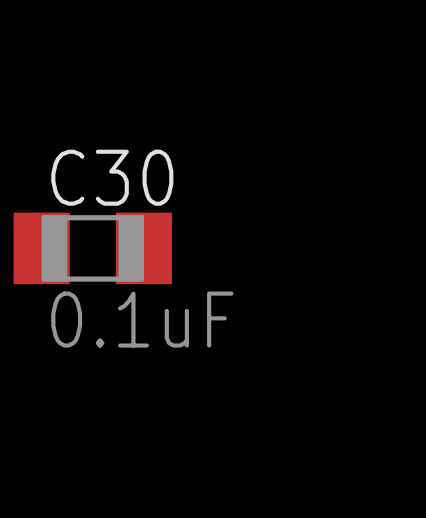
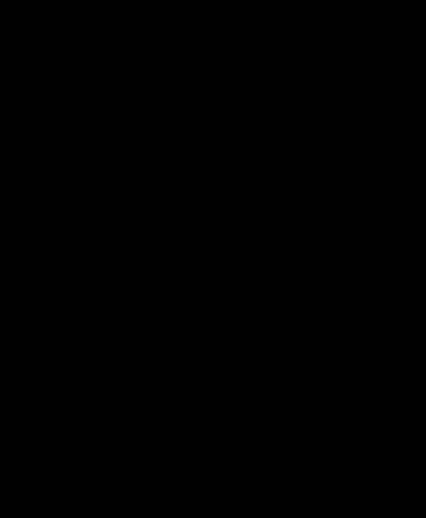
C30: 0.1uF (92, 248) -> none

